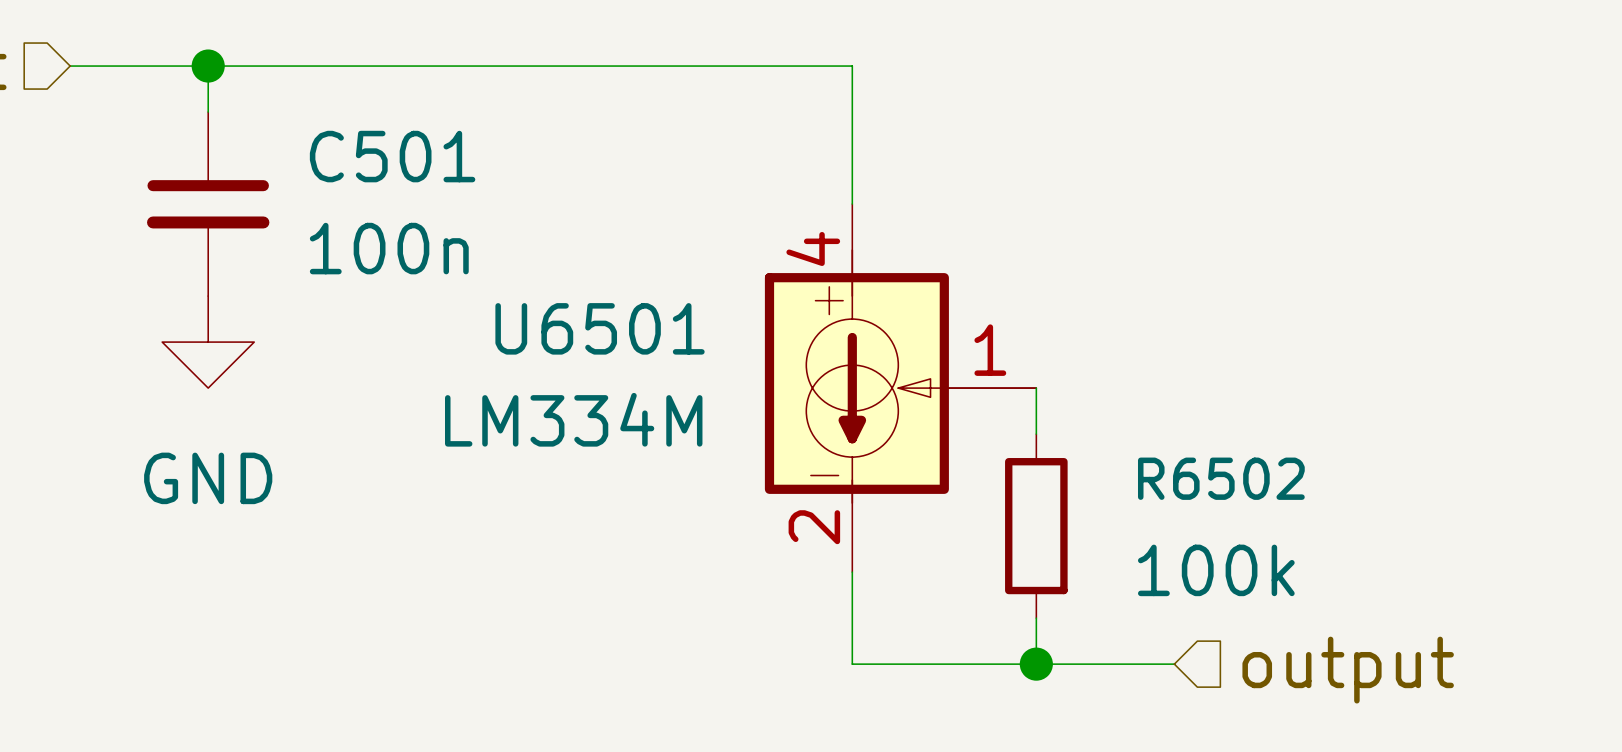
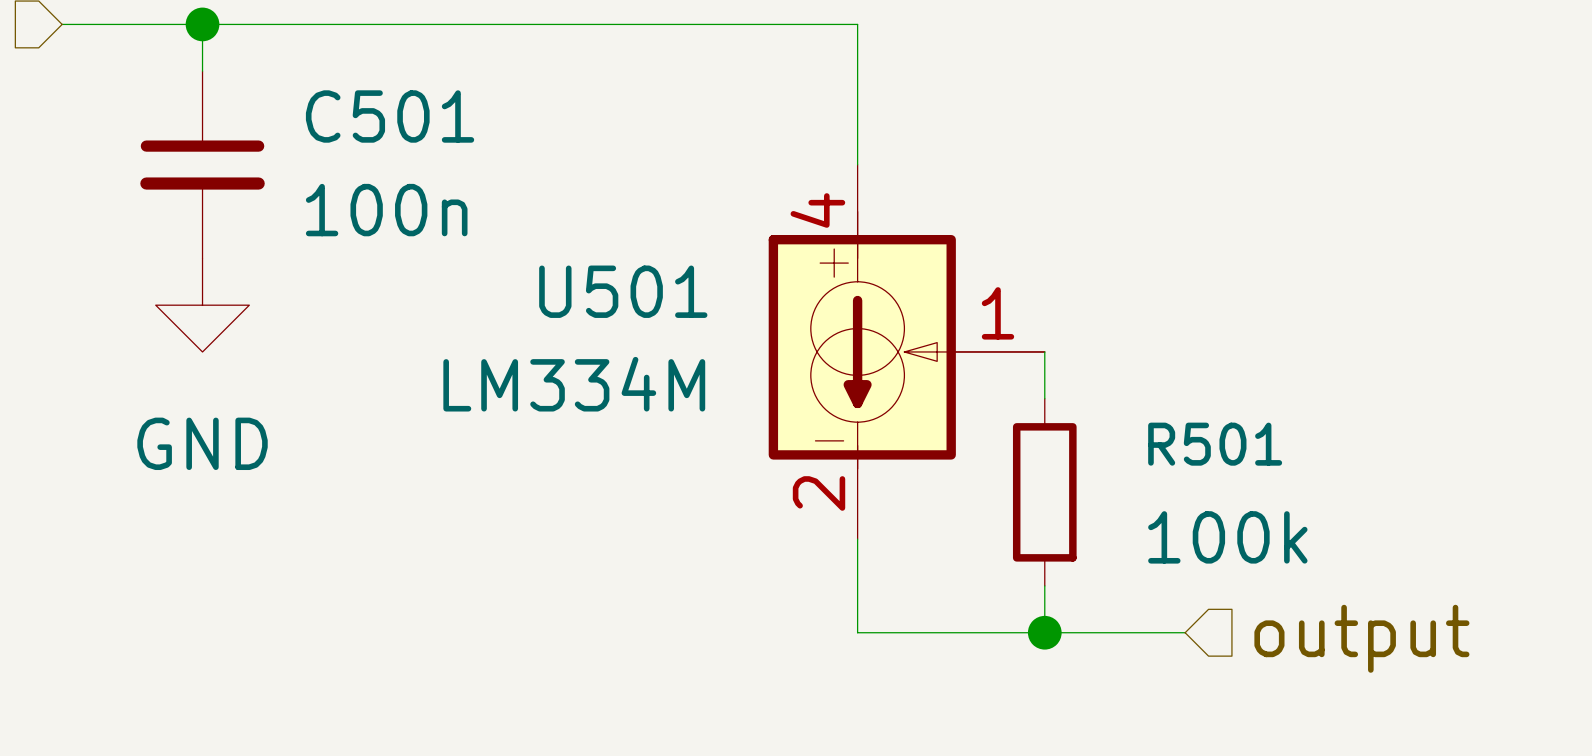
U6501 name: U6501 (600, 328) -> U501 (623, 291)
R6502 name: R6502 (1221, 478) -> R501 (1215, 444)

